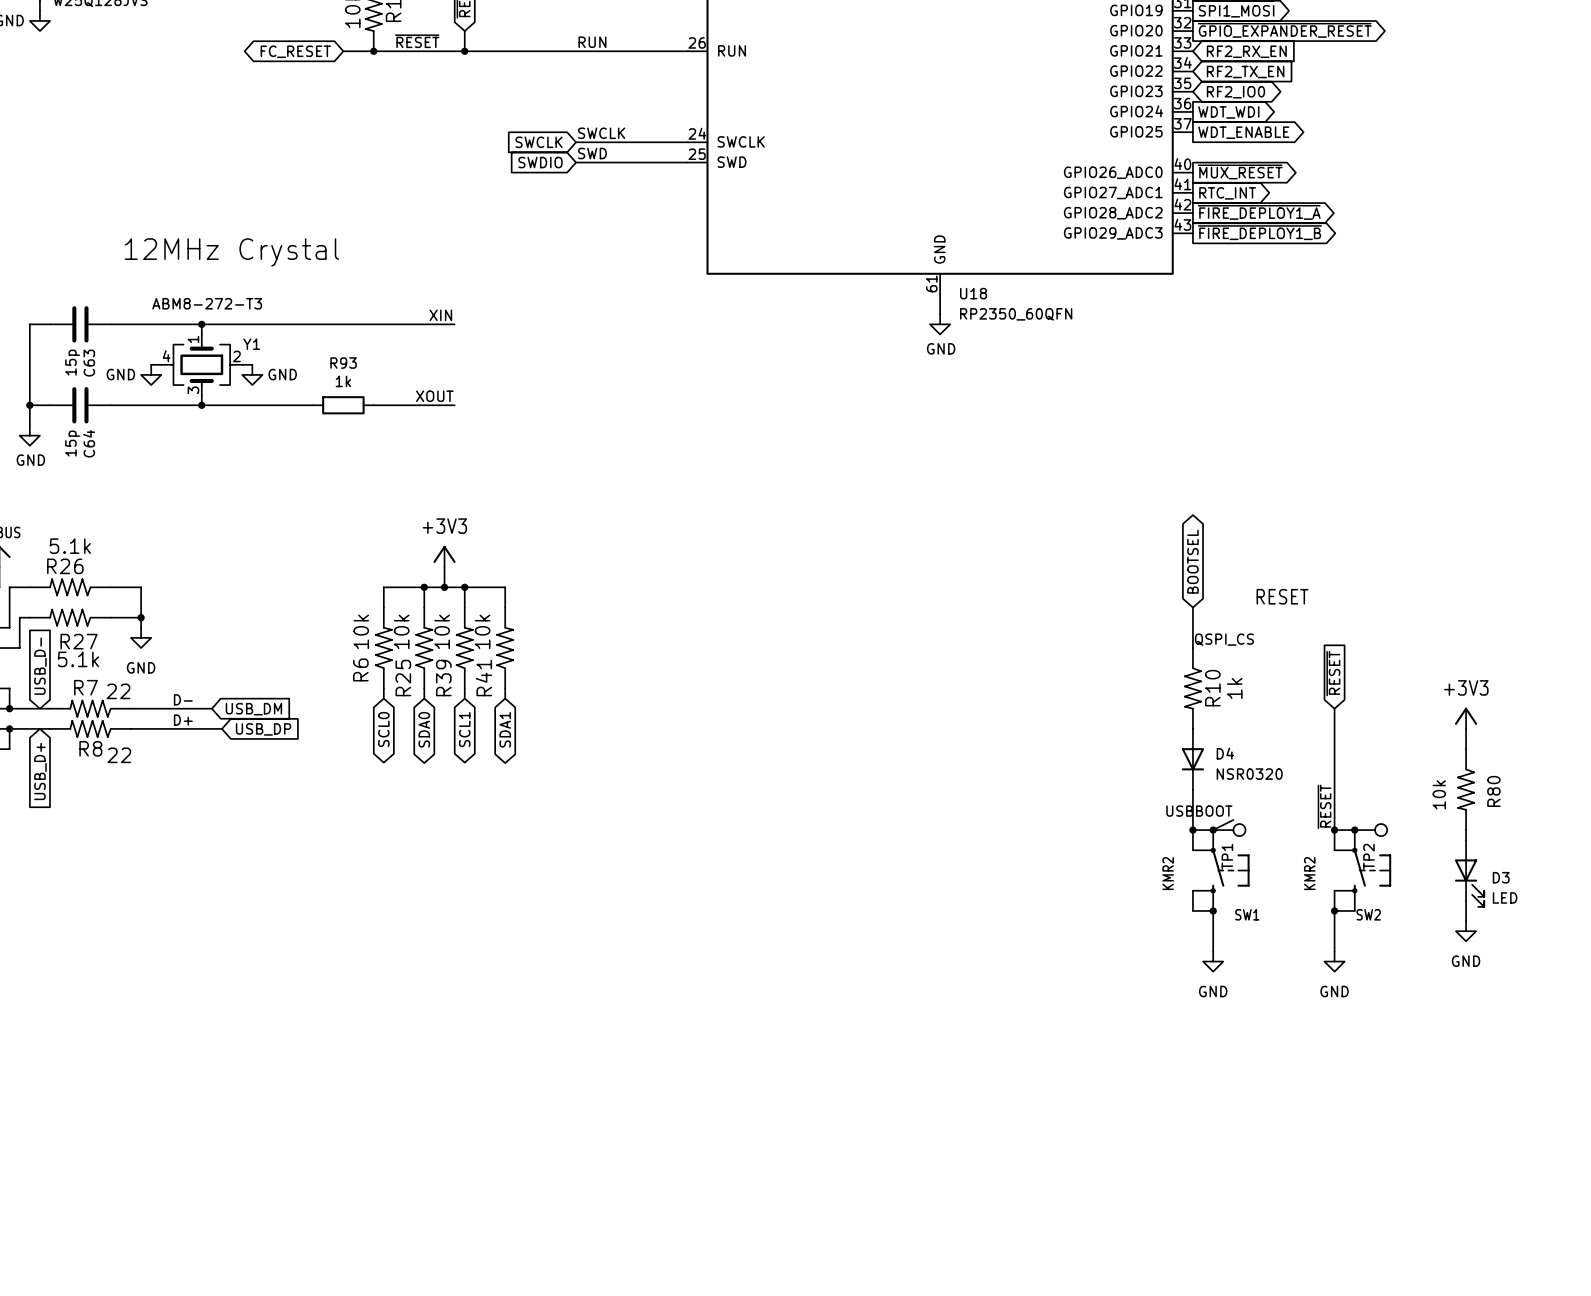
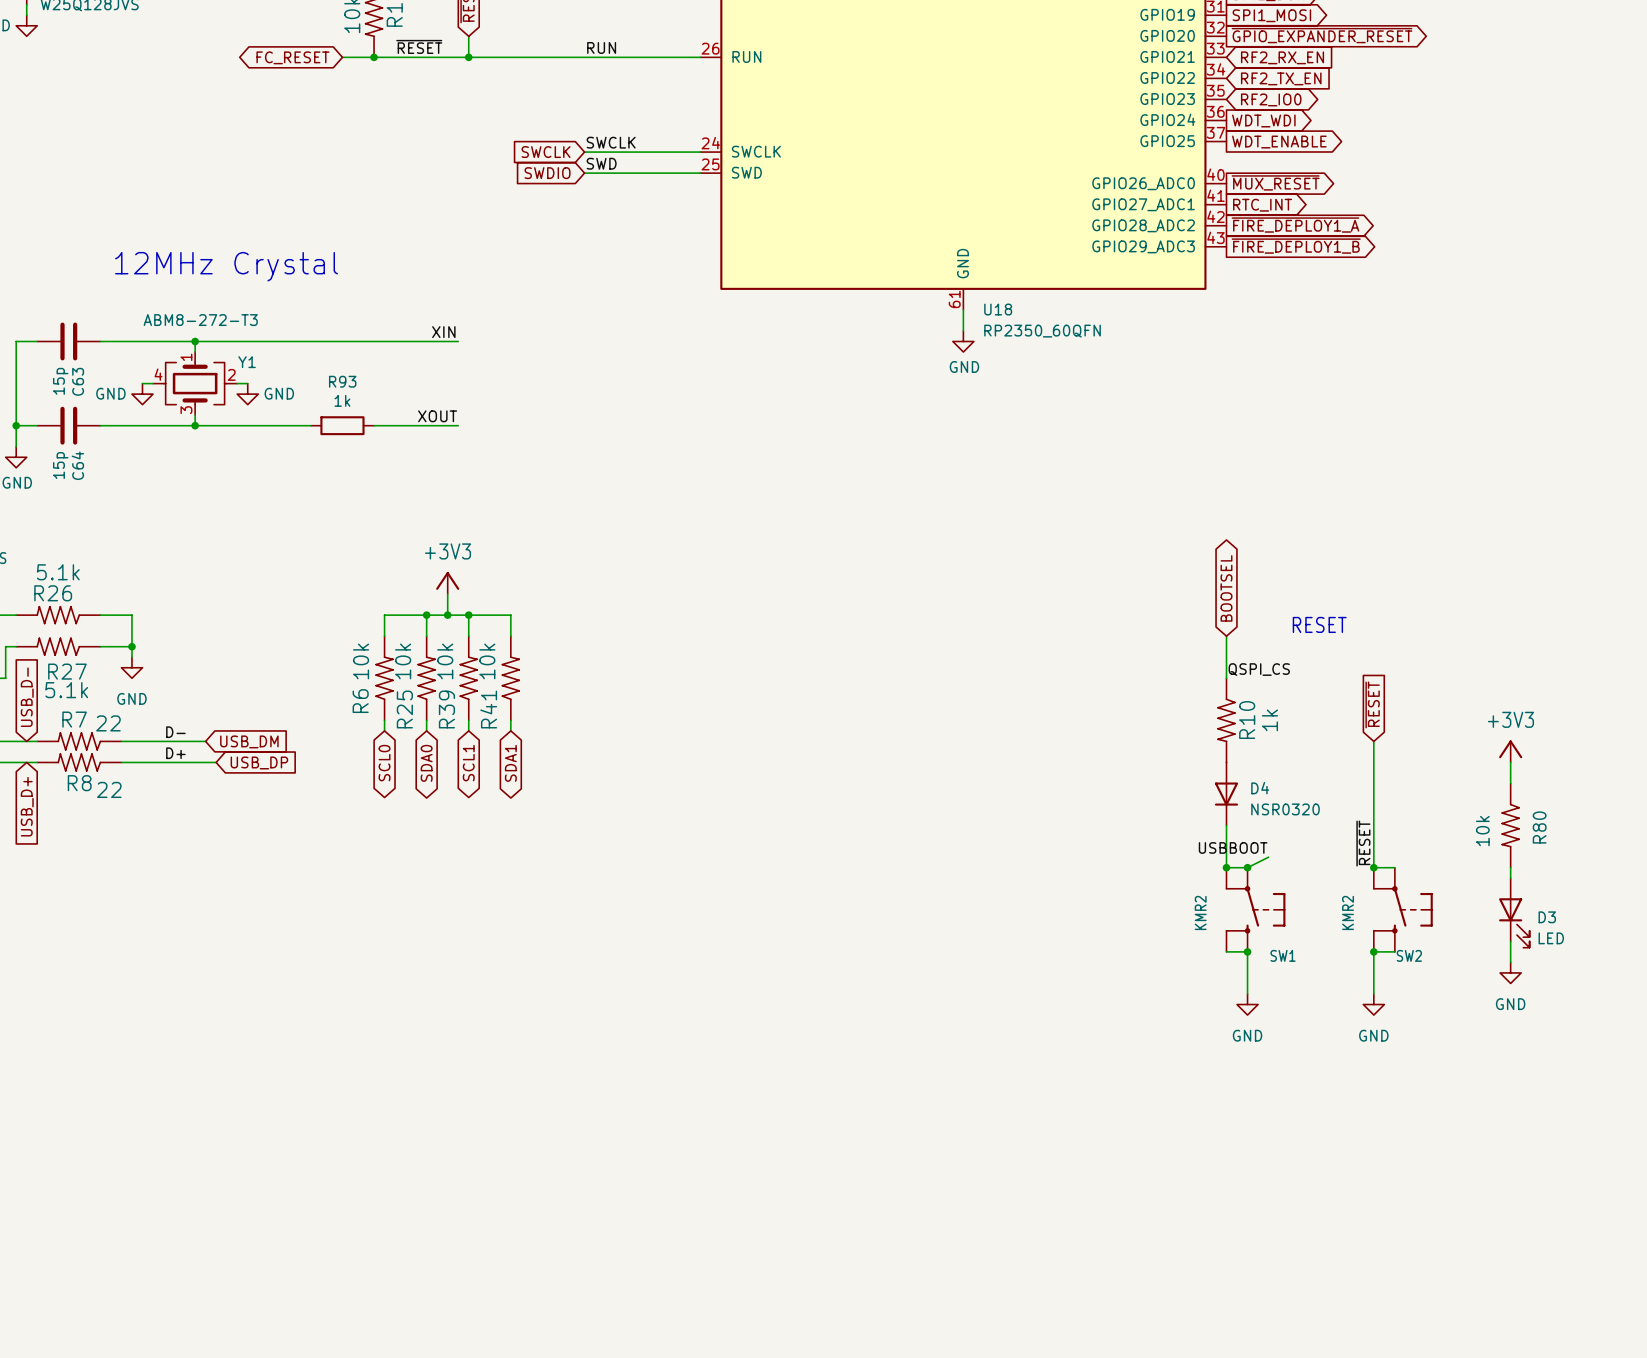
TP1: (1229, 830) -> none
junction: (1354, 830) -> none
TP2: (1370, 830) -> none

